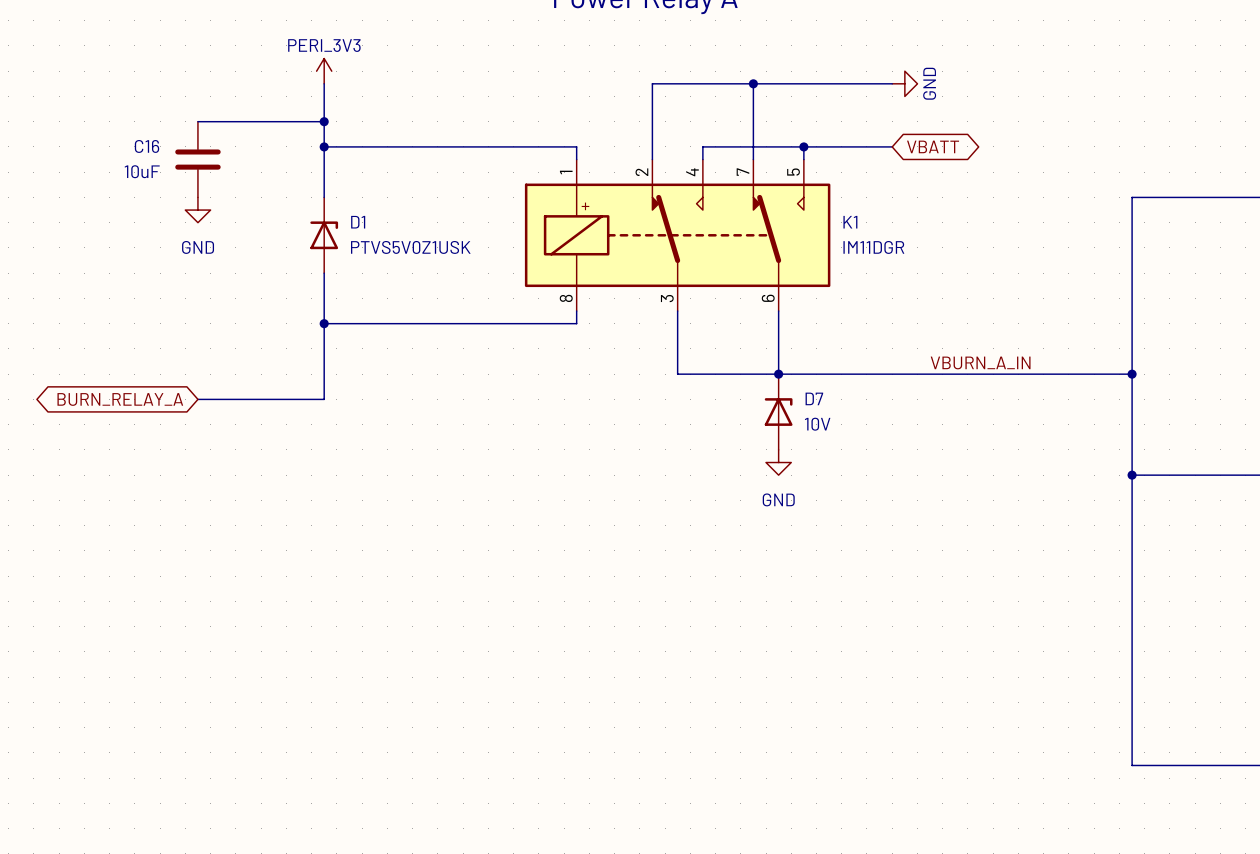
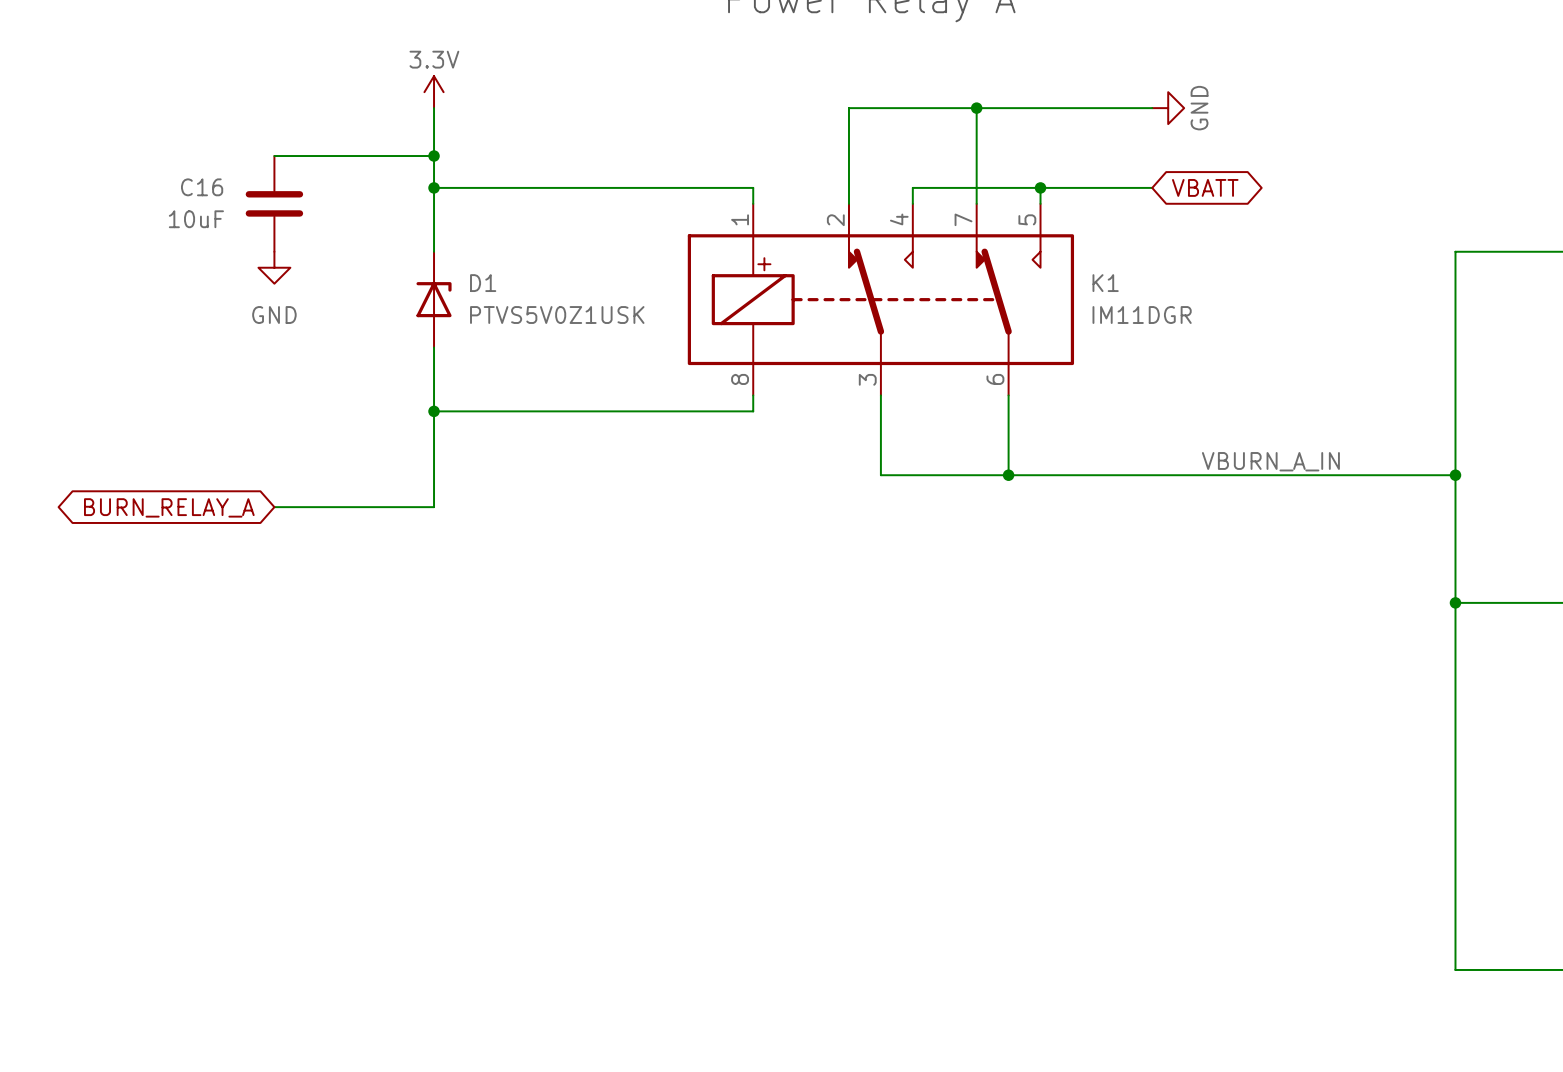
power symbol: PERI_3V3 (324, 71) -> 3.3V (434, 92)
D7: 10V (778, 412) -> none
power symbol: GND (778, 462) -> none

